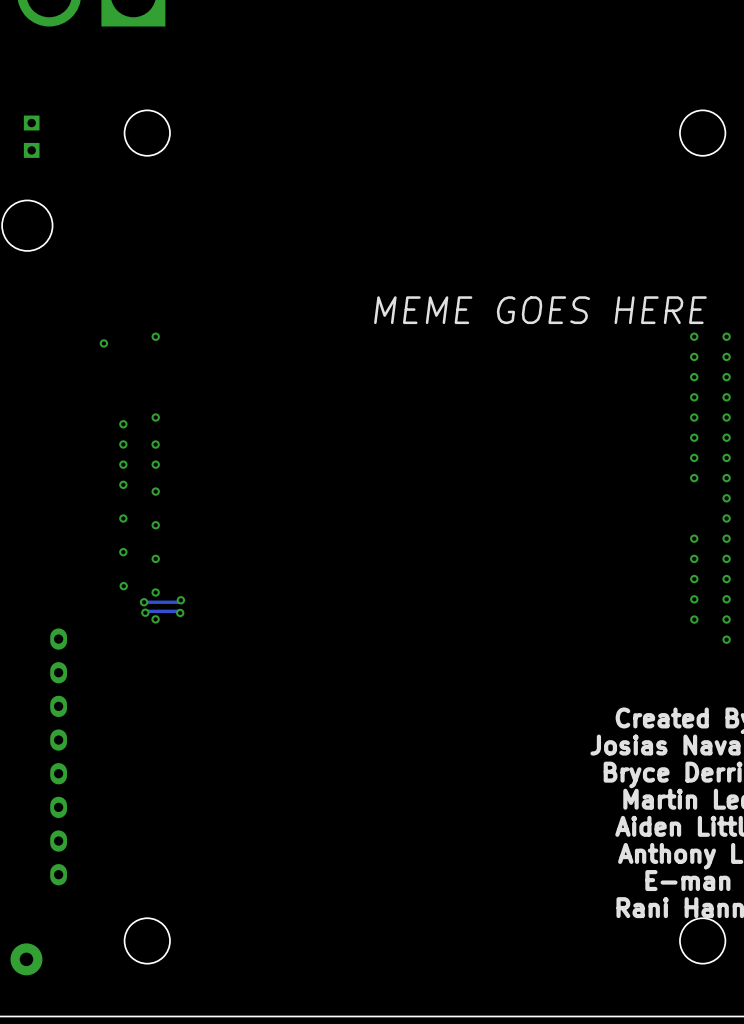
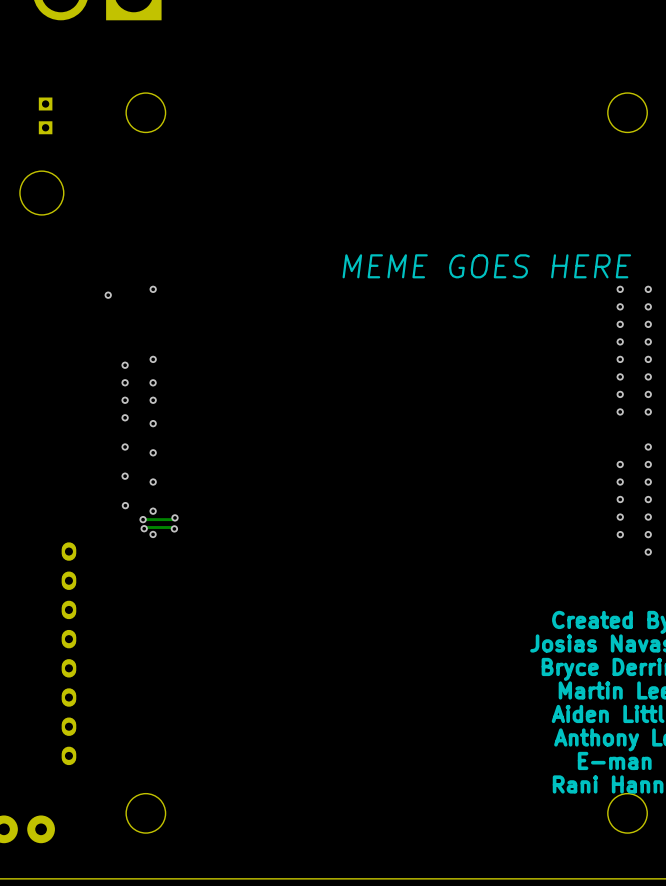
via: (726, 498) -> none

